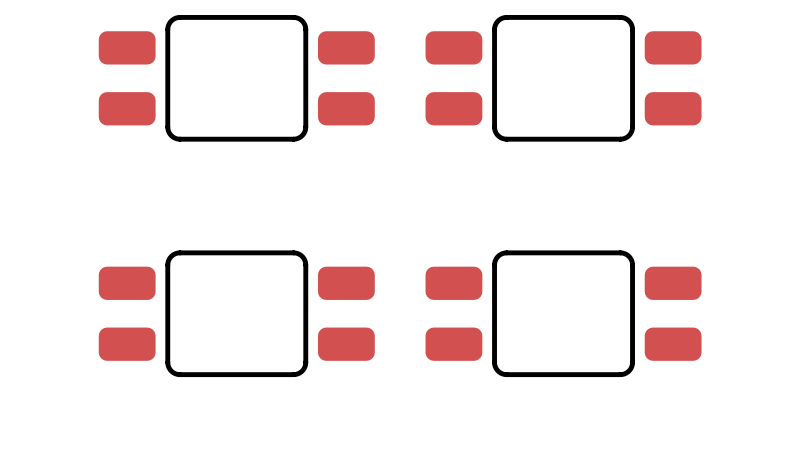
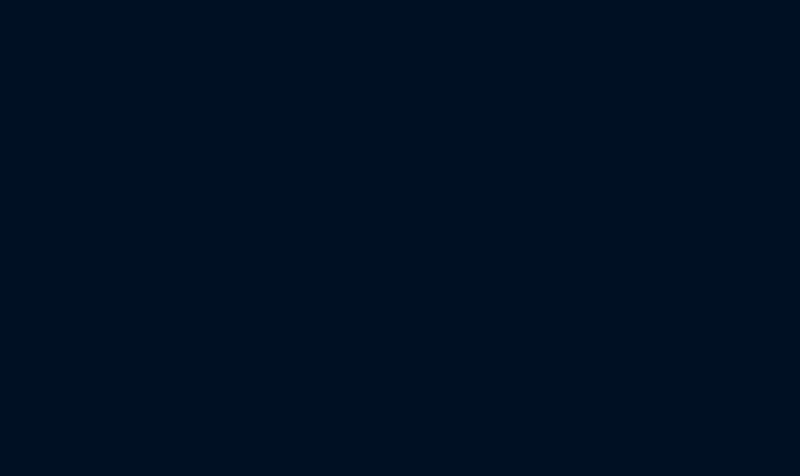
part: (236, 78) -> none
part: (563, 78) -> none
part: (236, 313) -> none
part: (563, 313) -> none

